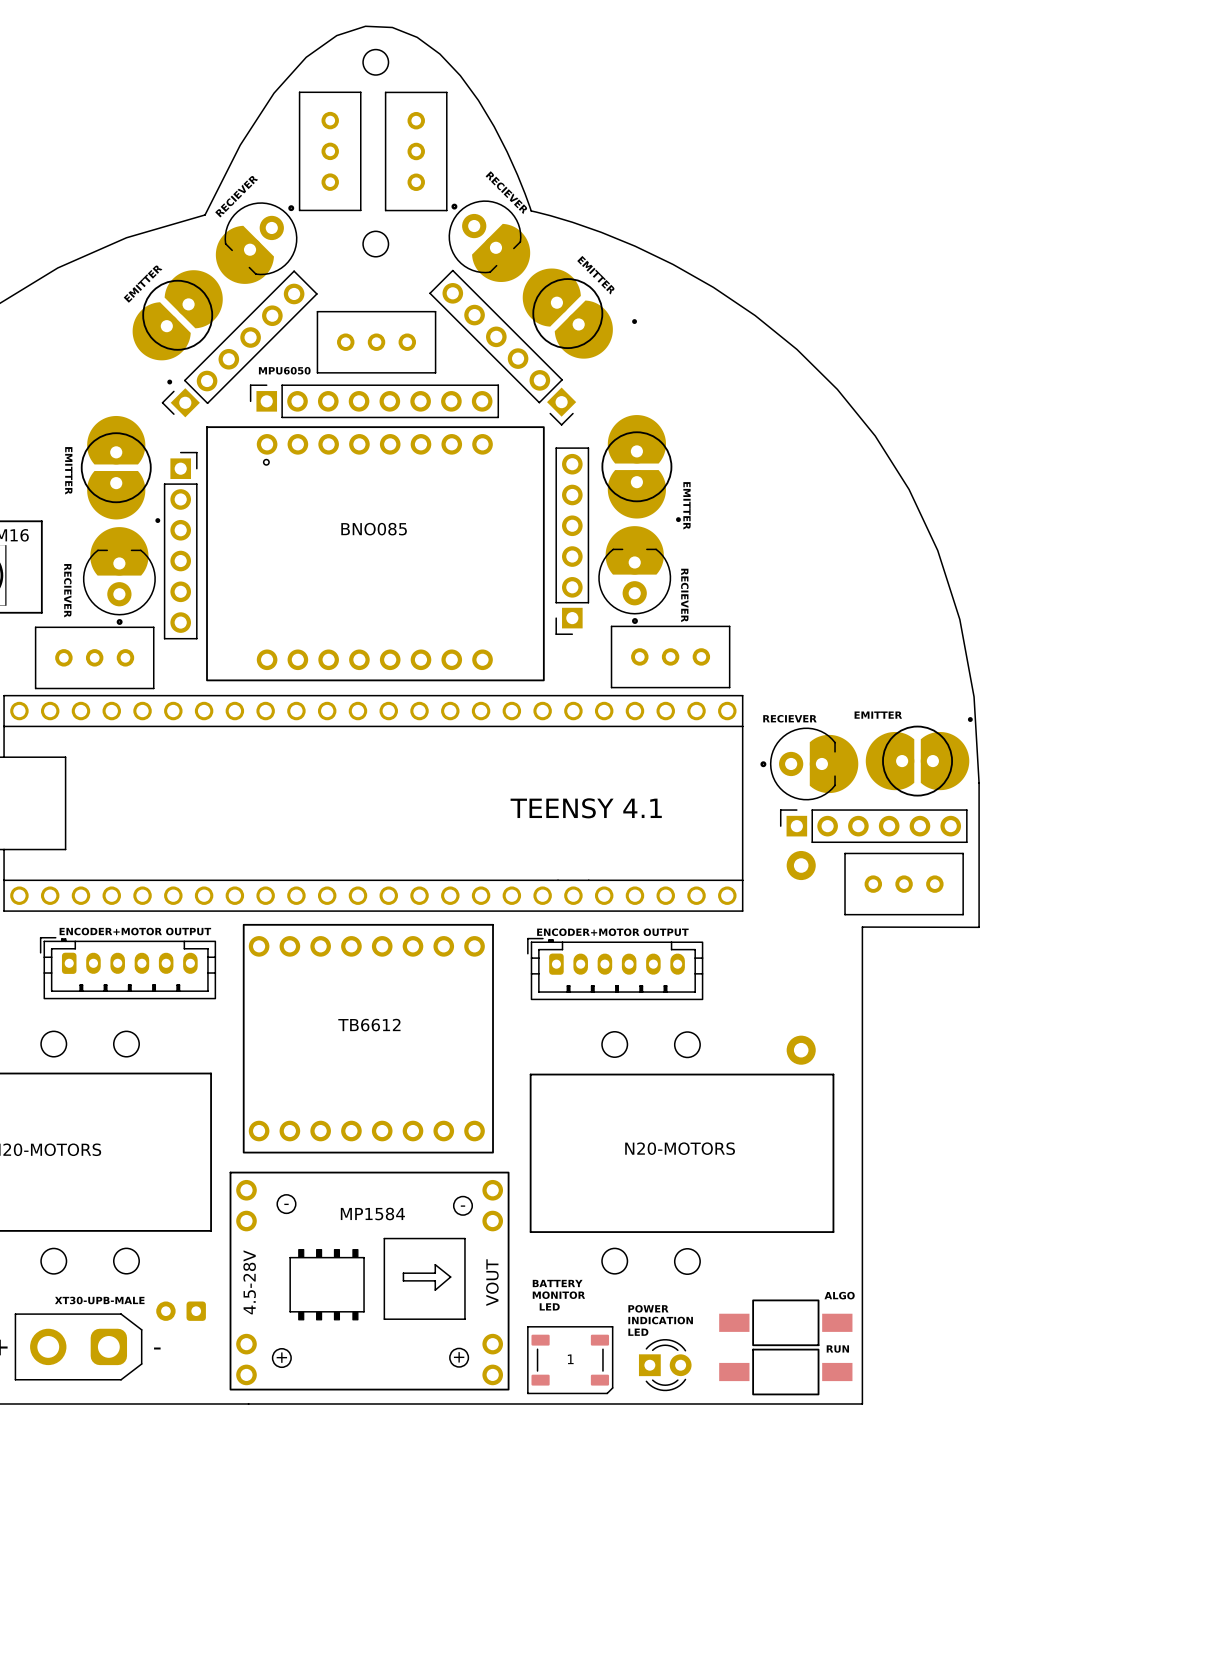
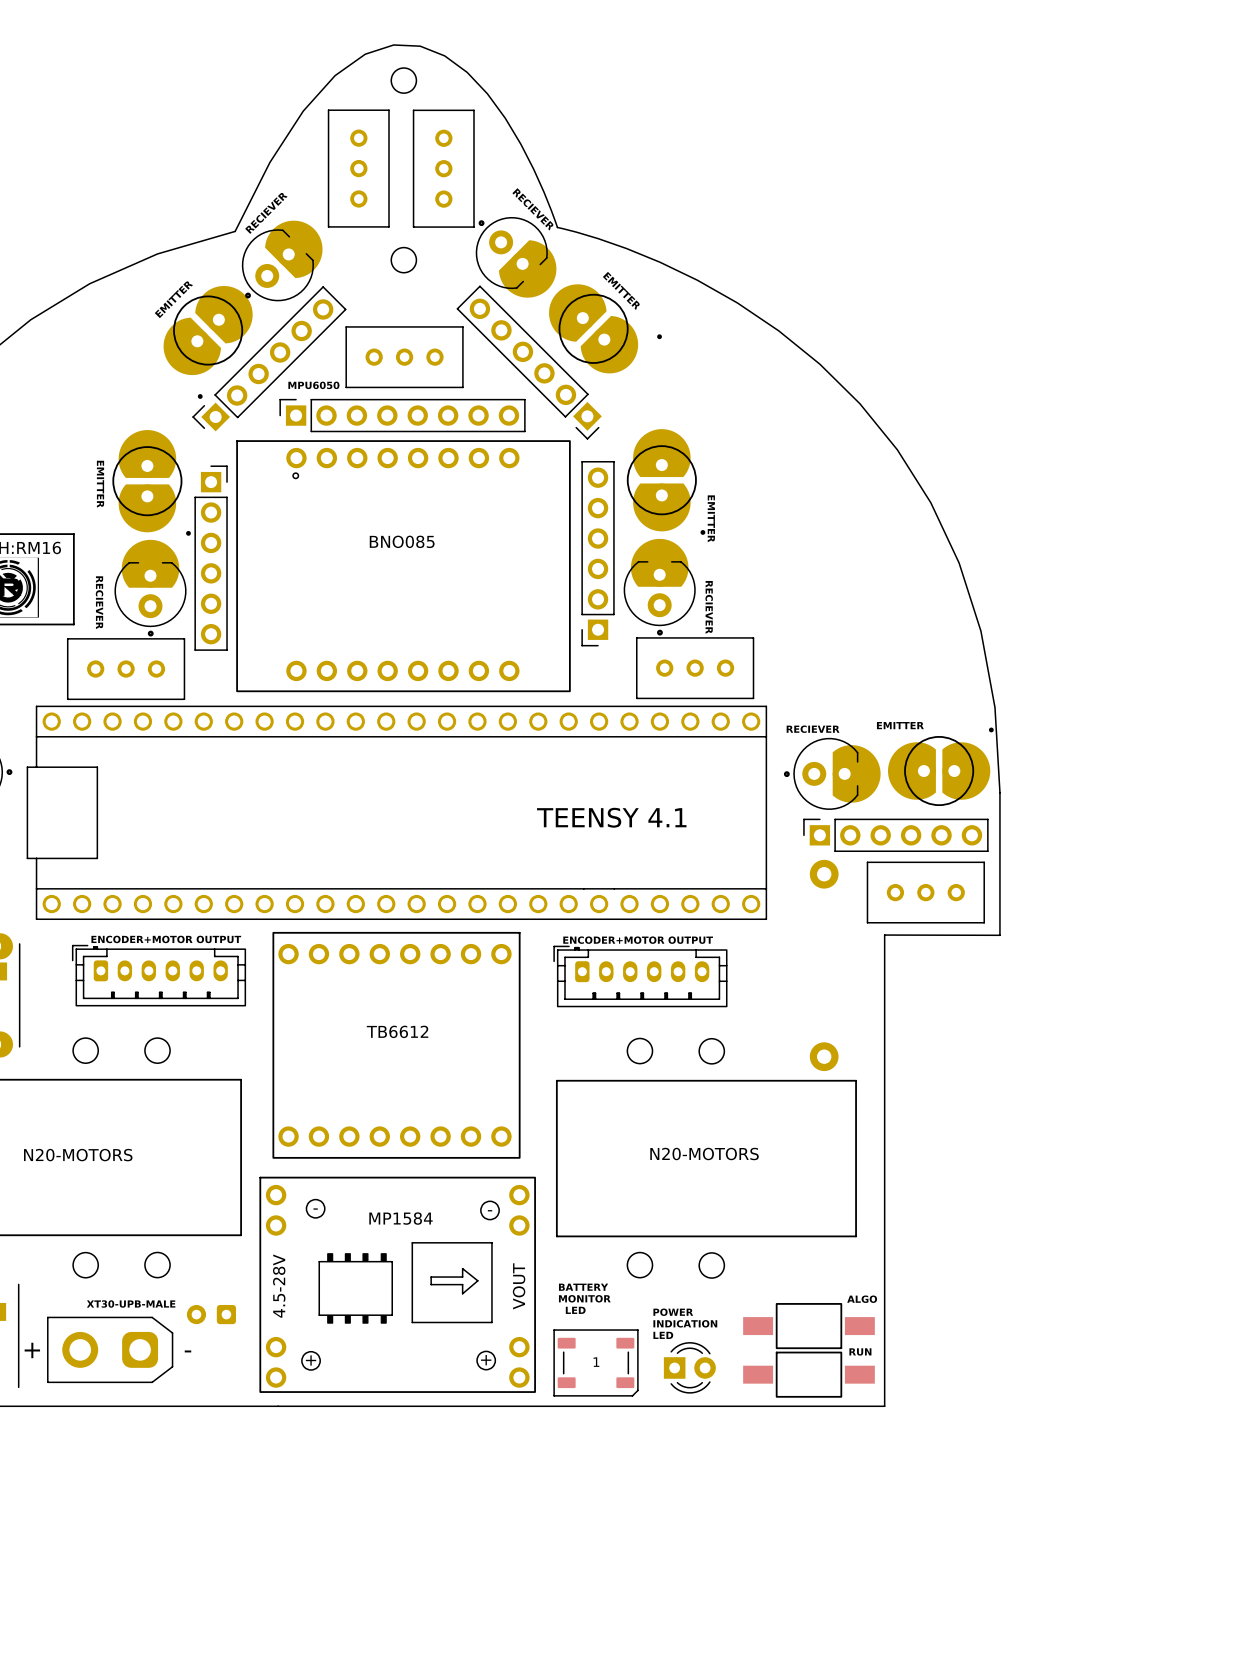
part rotation: 0° (256, 243) -> 180° (282, 261)

